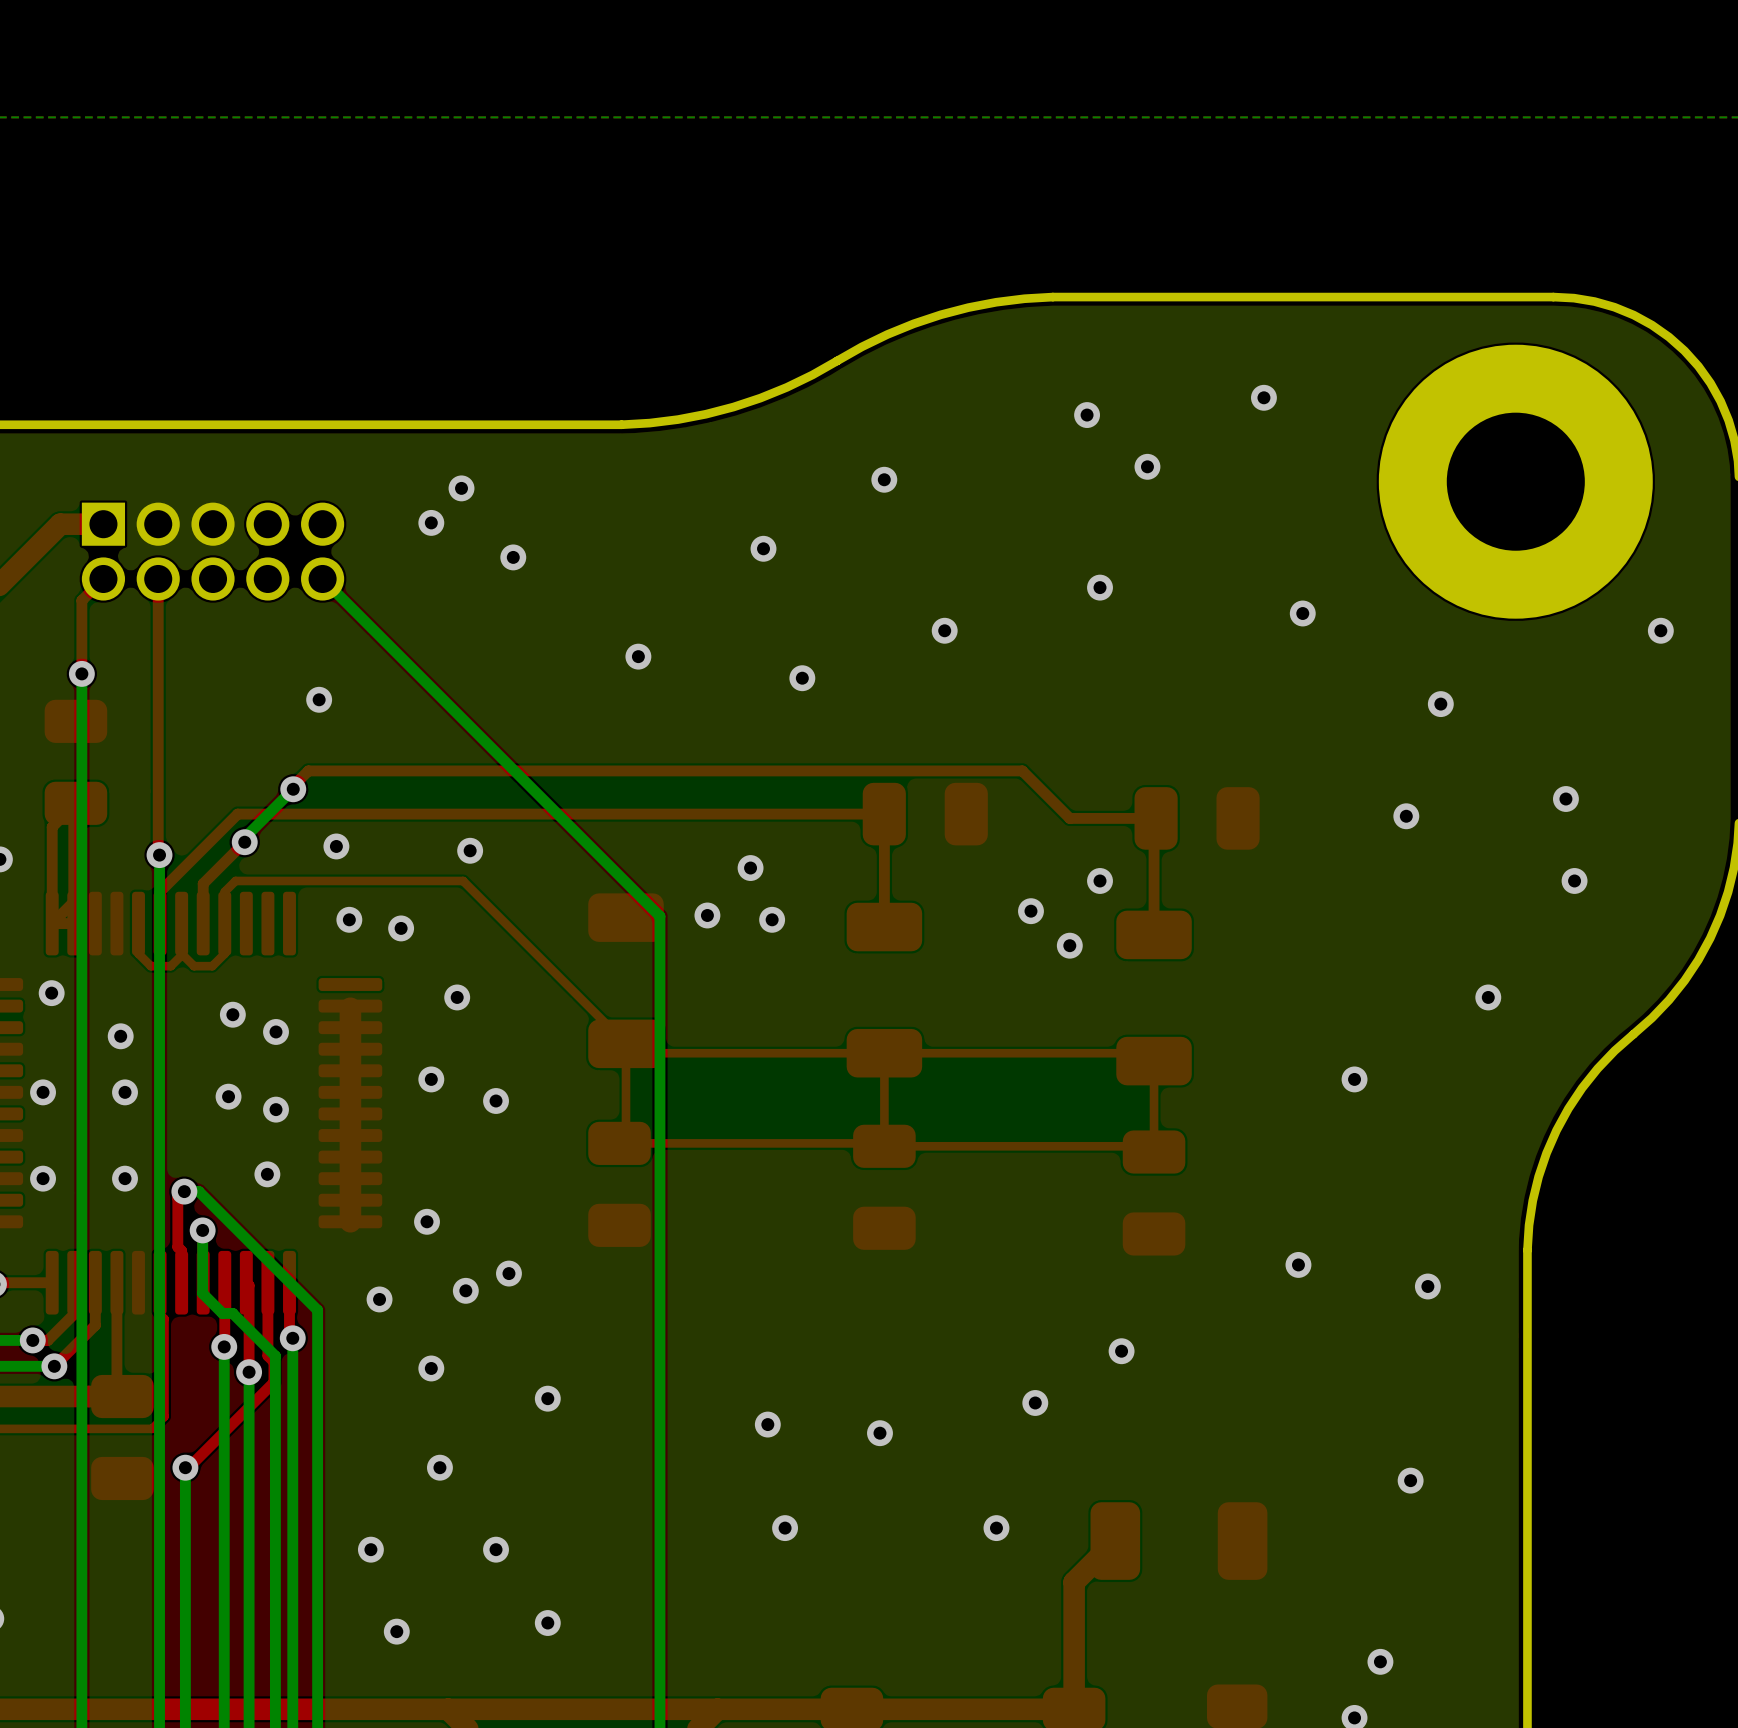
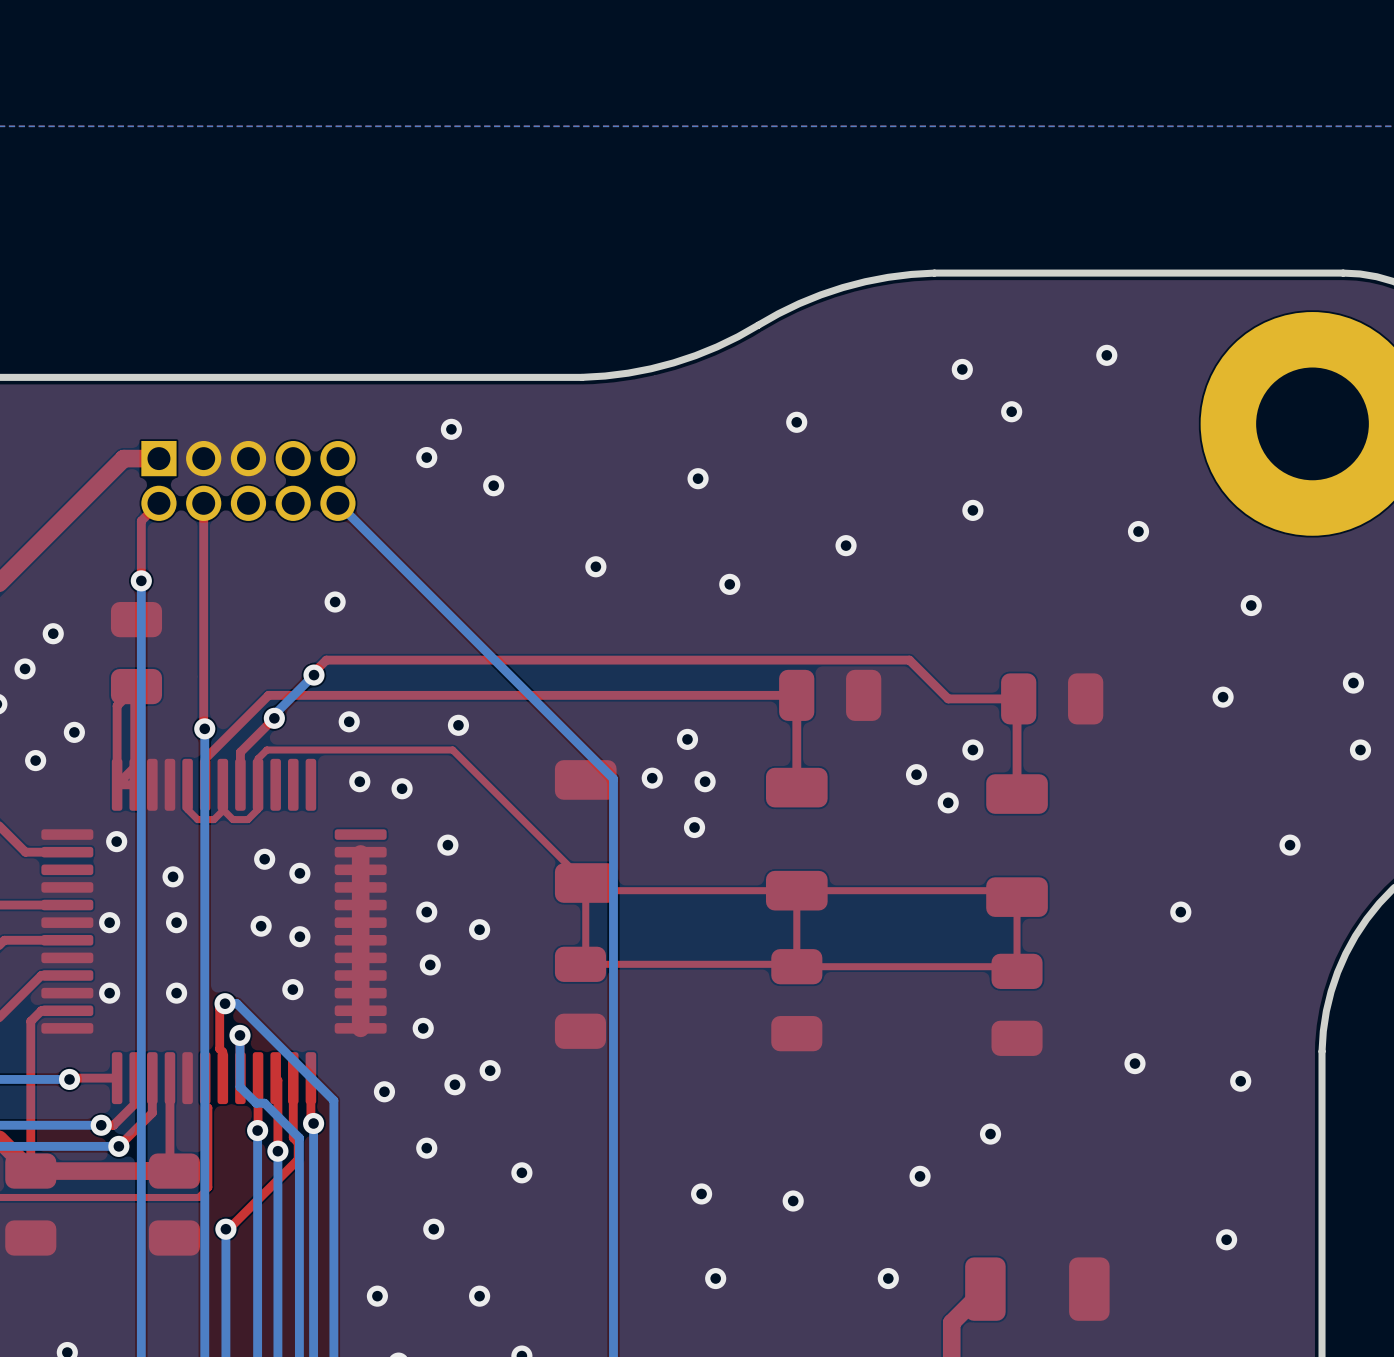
via: none -> (694, 827)
via: none -> (430, 964)

